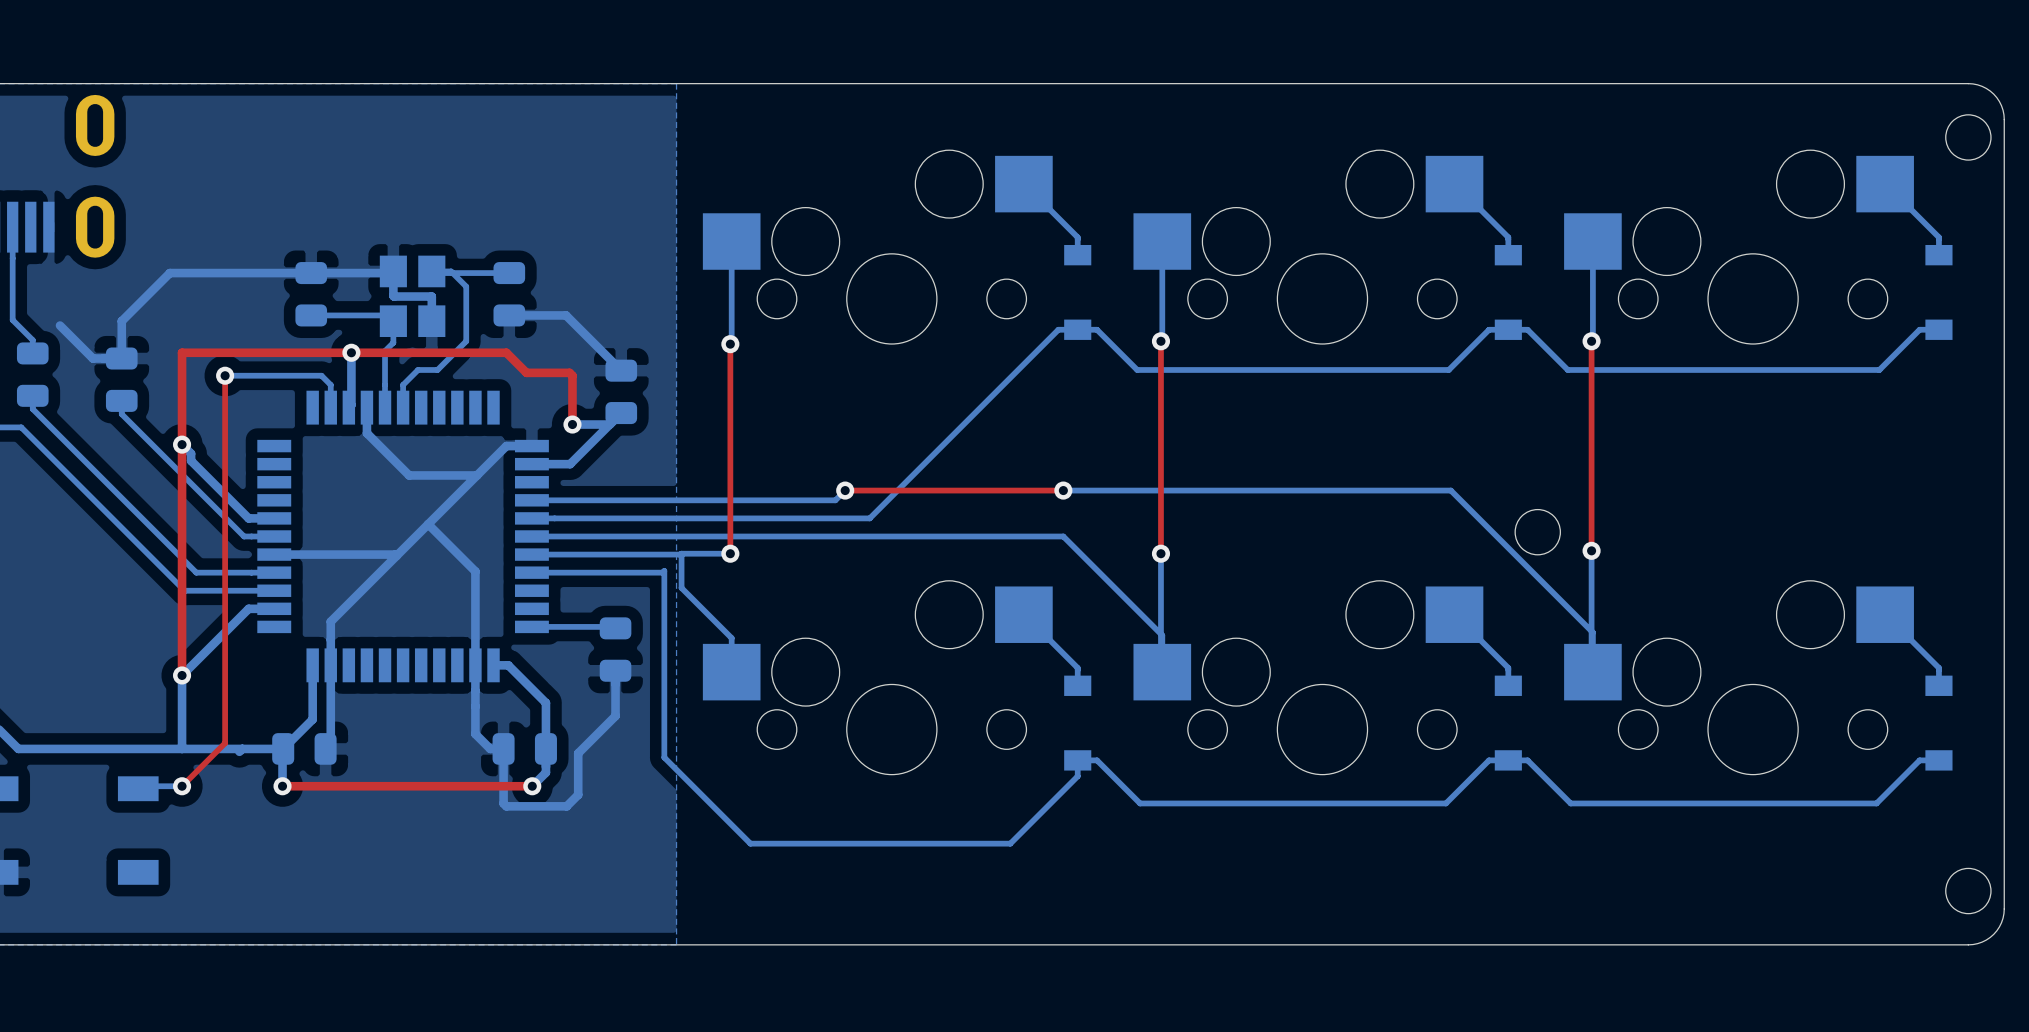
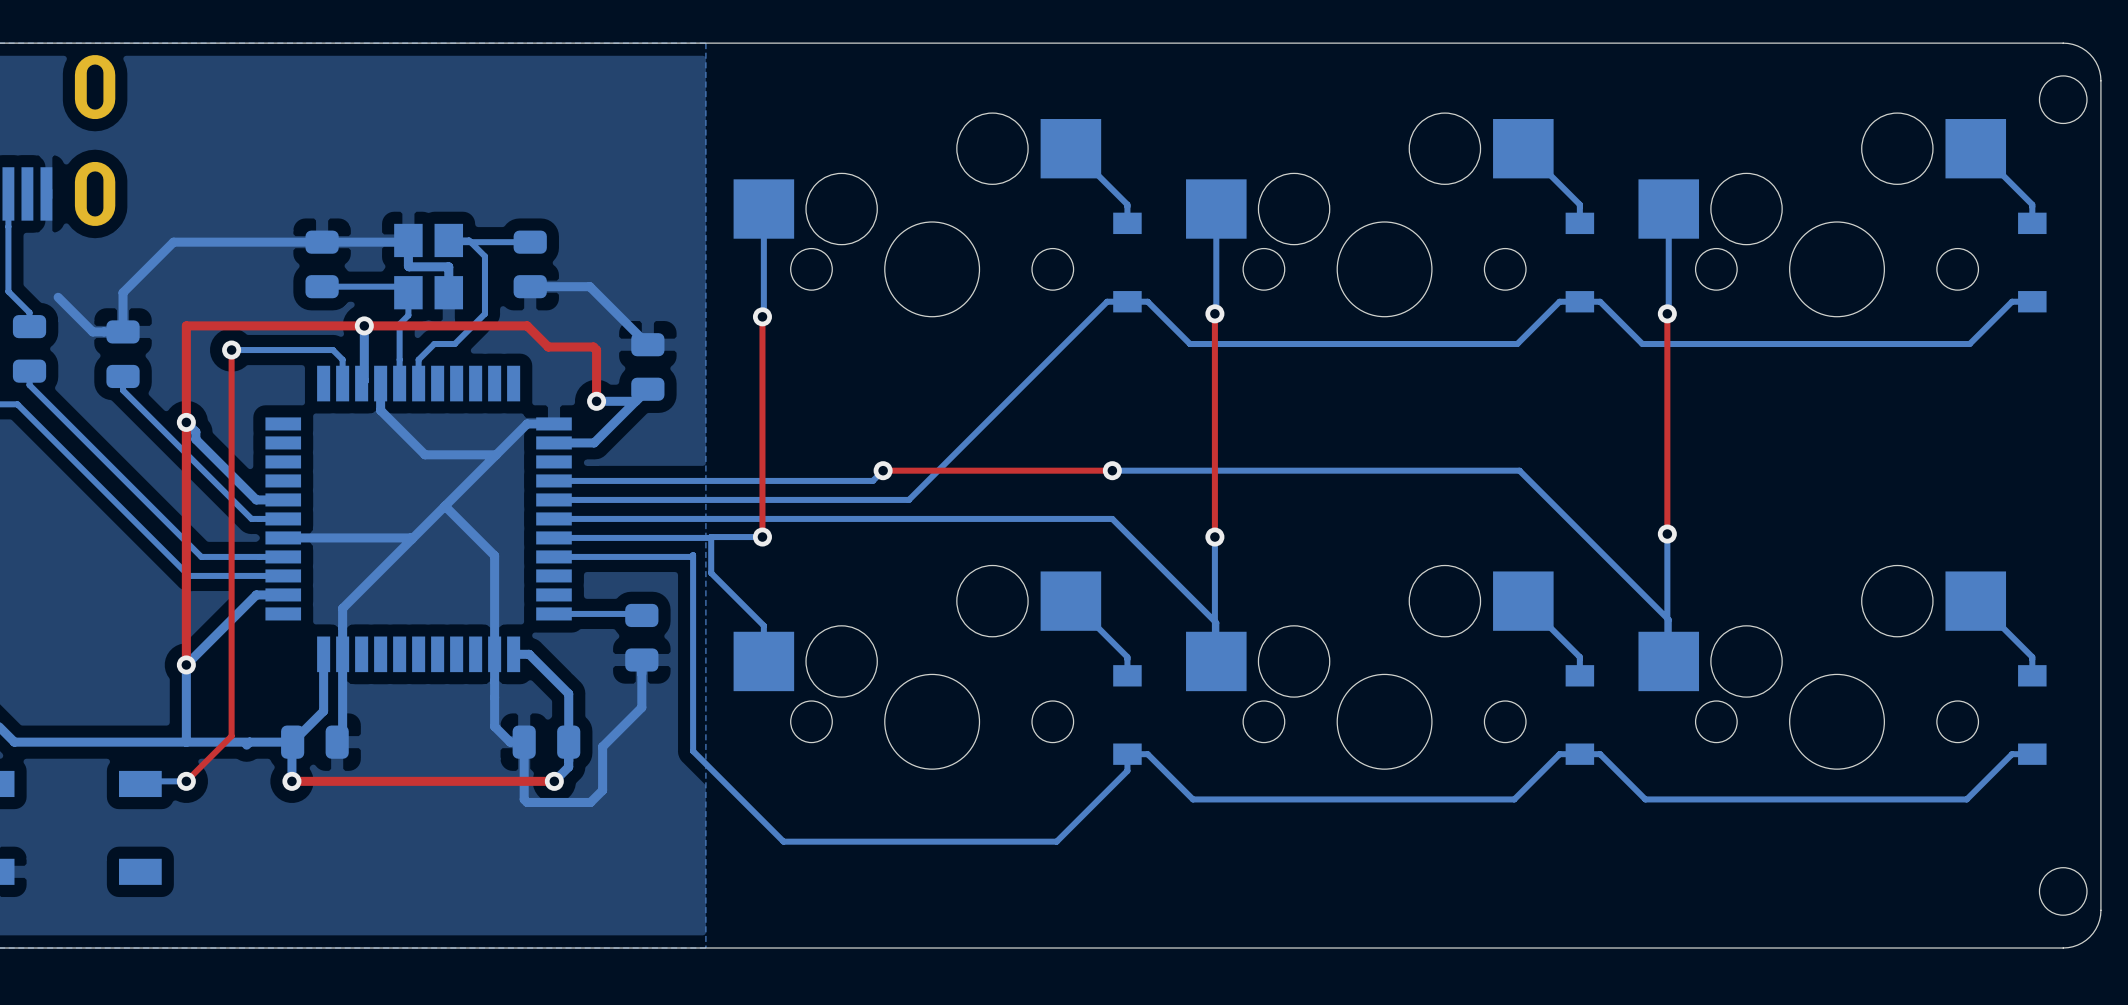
round board edge: [1514, 509, 1561, 556] -> none

